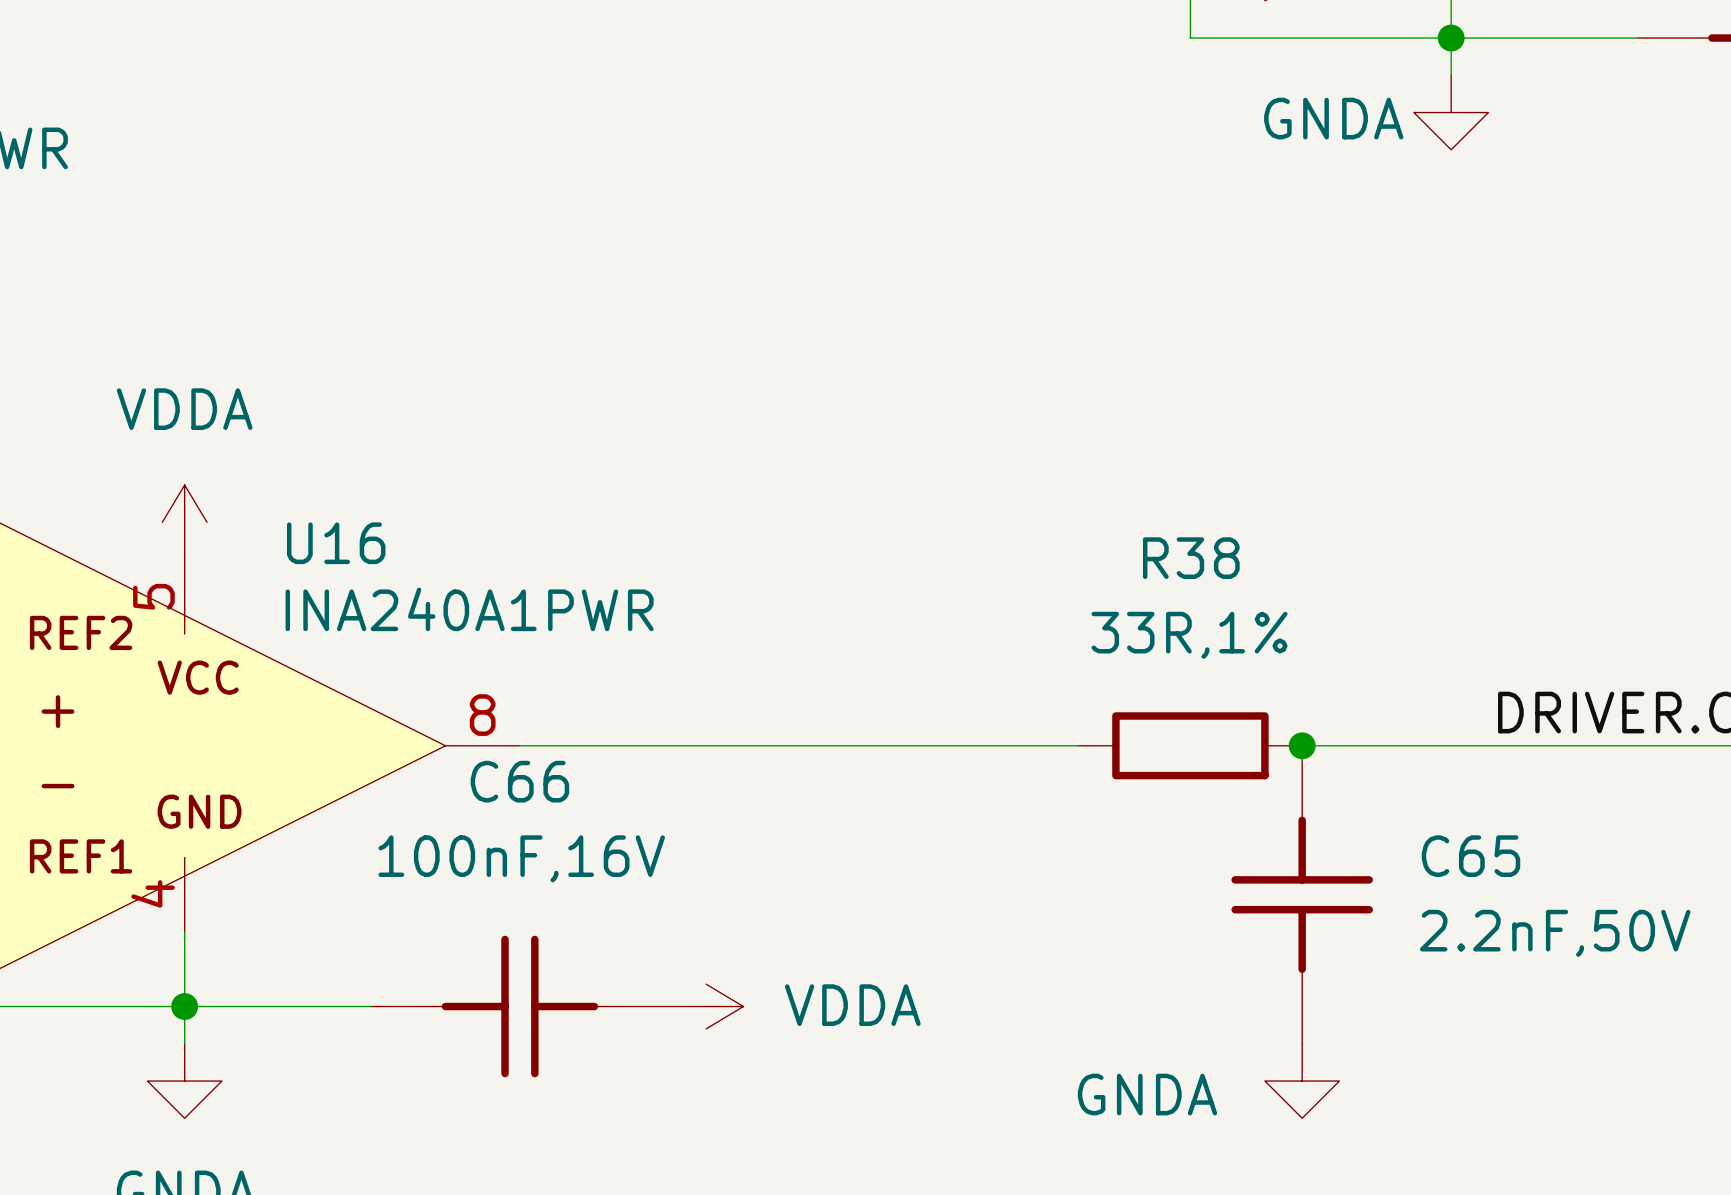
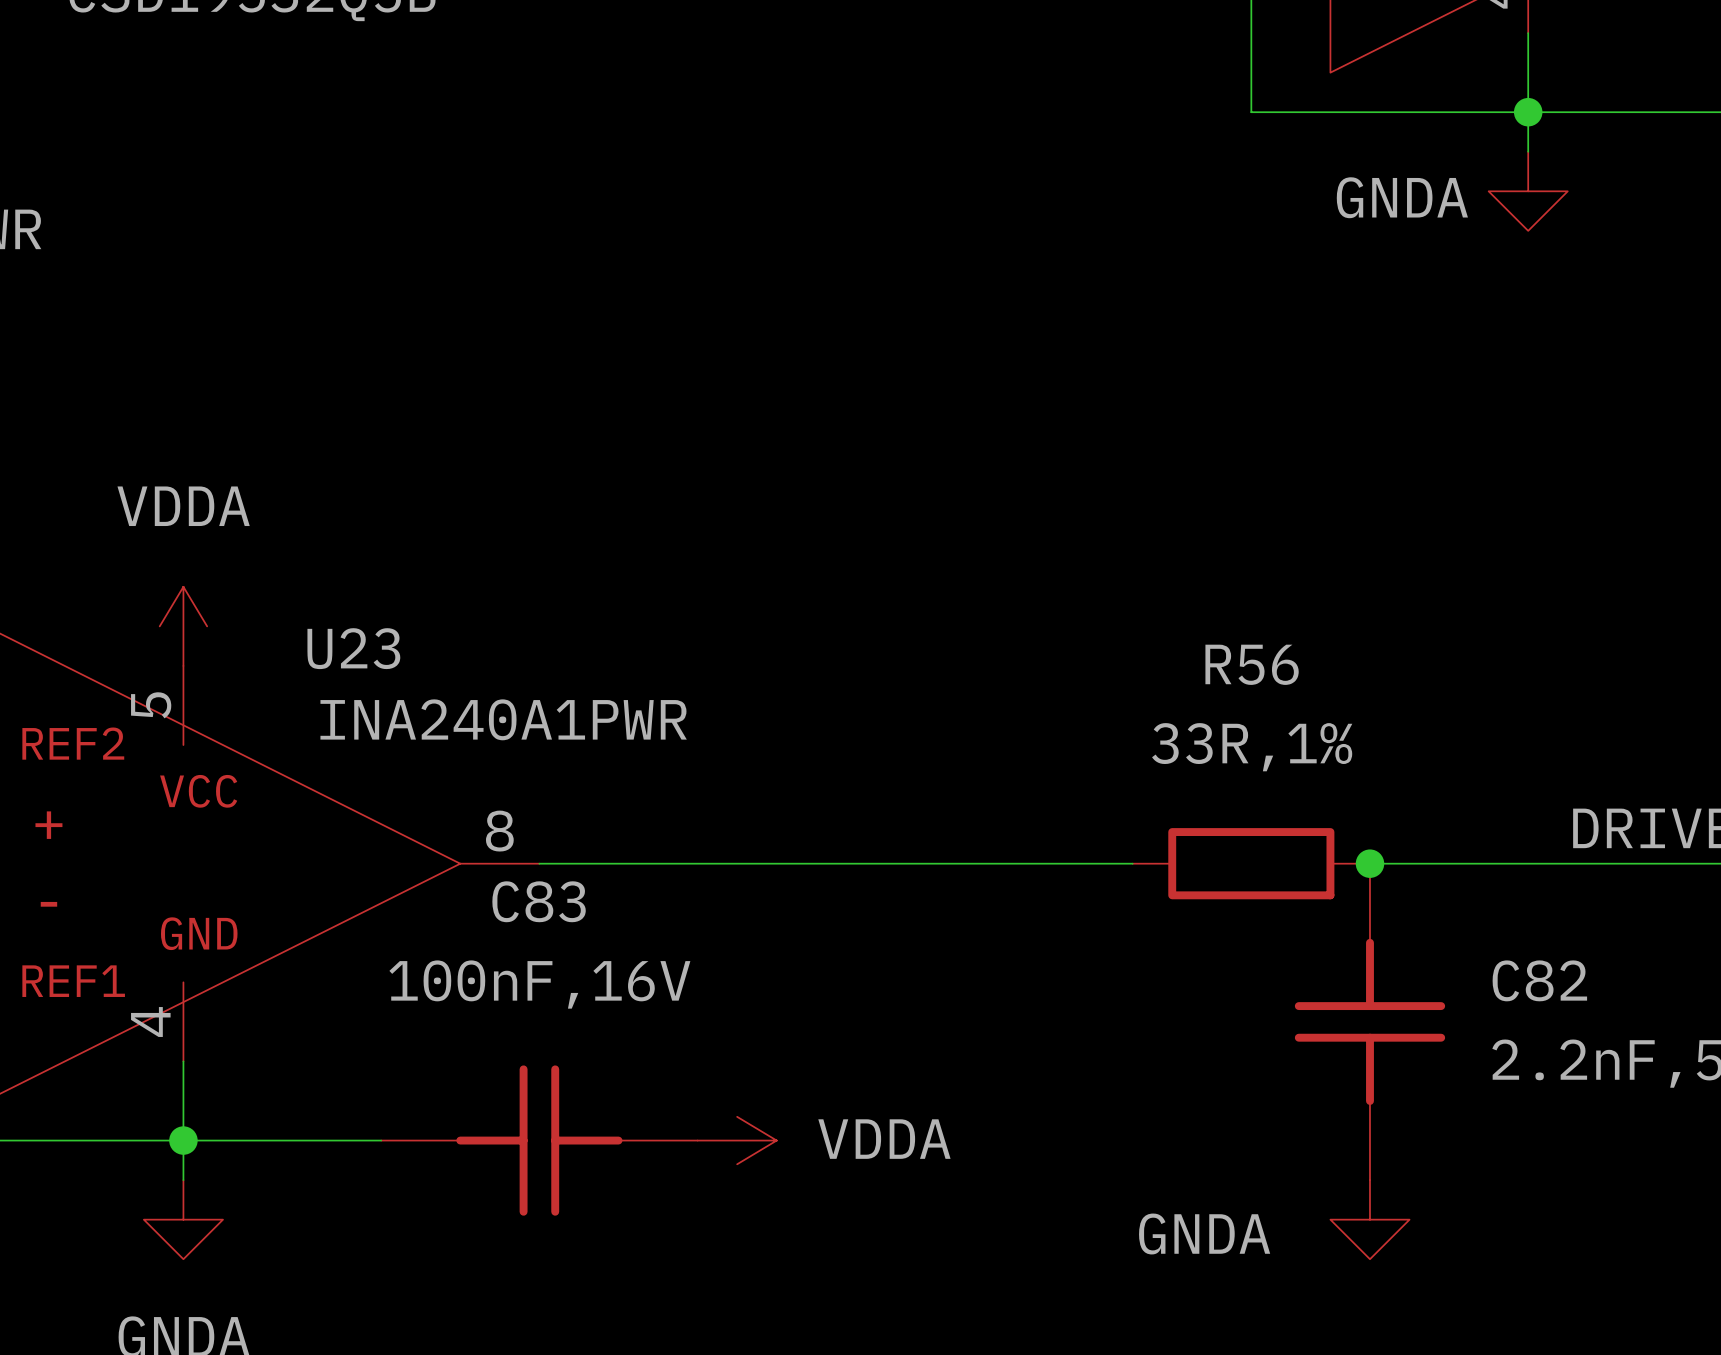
U16 name: U16 (336, 543) -> U23 (353, 648)
R38 name: R38 (1191, 558) -> R56 (1252, 664)
C66 name: C66 (519, 781) -> C83 (539, 901)
C65 name: C65 (1470, 856) -> C82 (1539, 980)

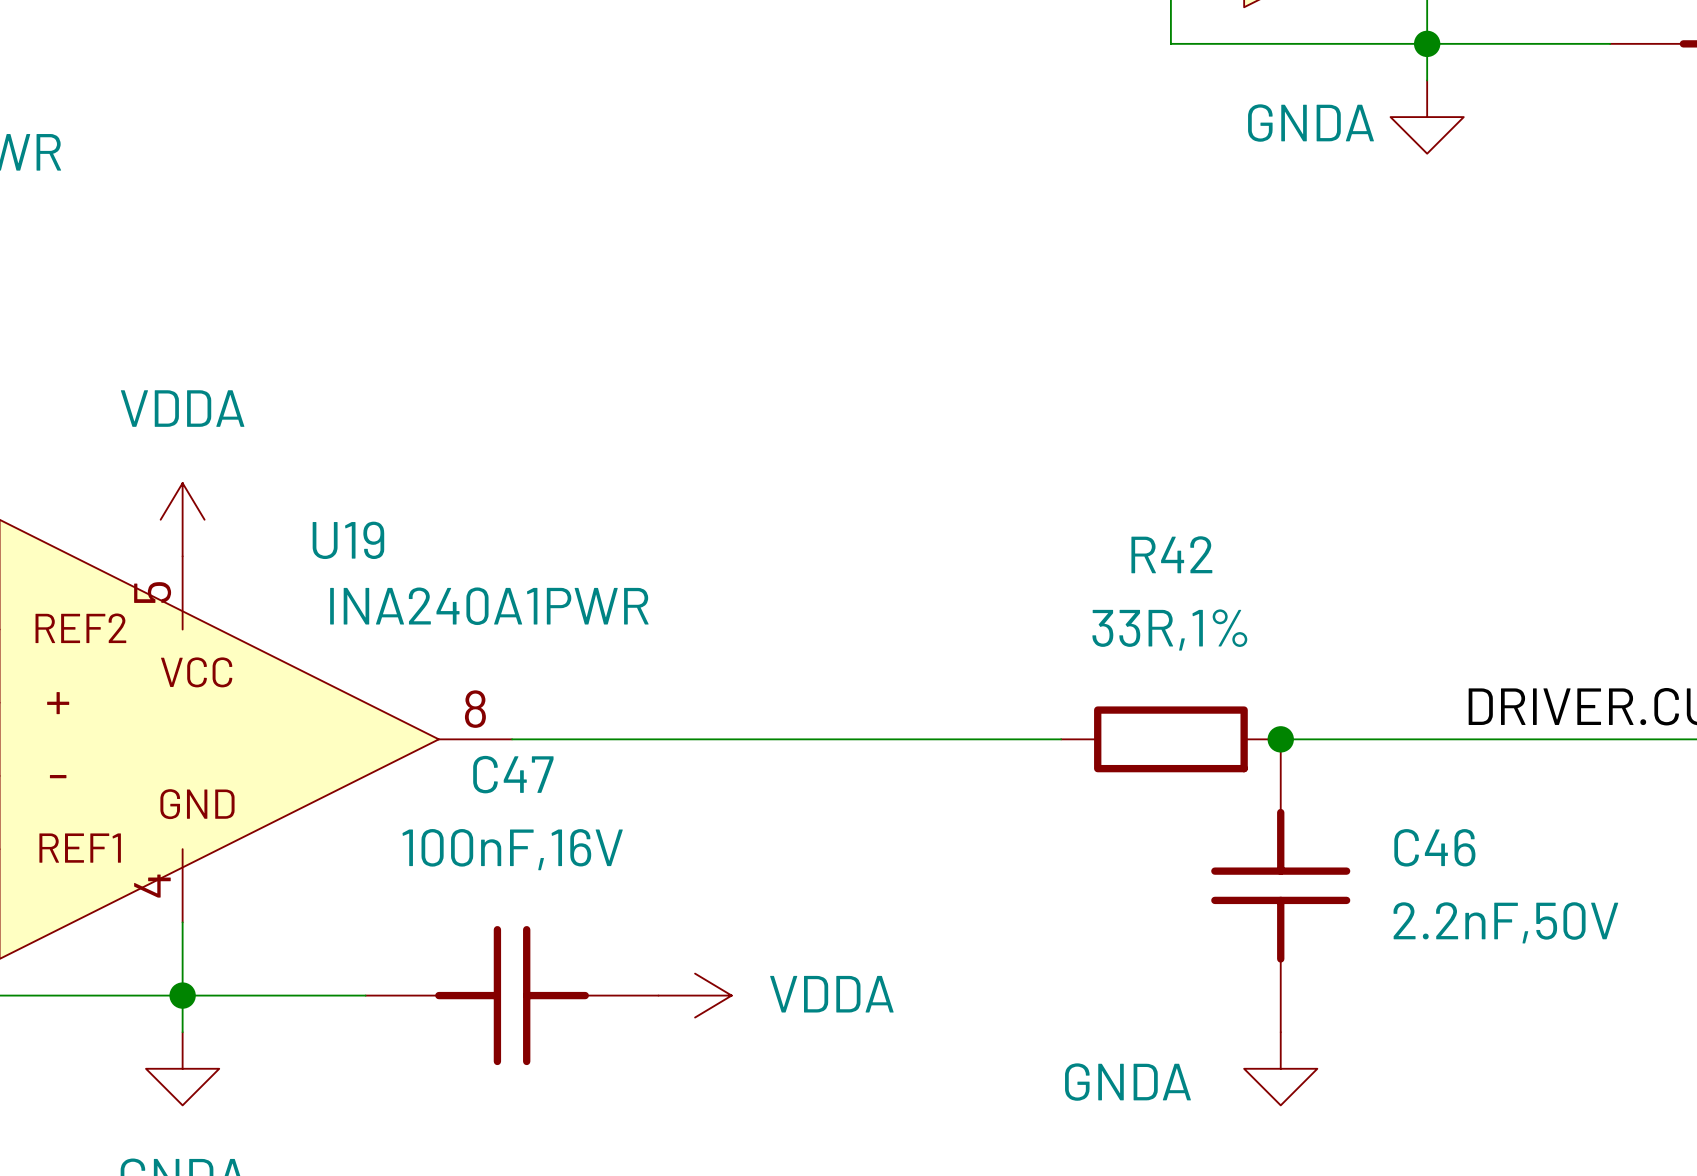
U23 name: U23 (353, 648) -> U19 (348, 540)
R56 name: R56 (1252, 664) -> R42 (1171, 554)
C83 name: C83 (539, 901) -> C47 (513, 774)
C82 name: C82 (1539, 980) -> C46 (1434, 847)

